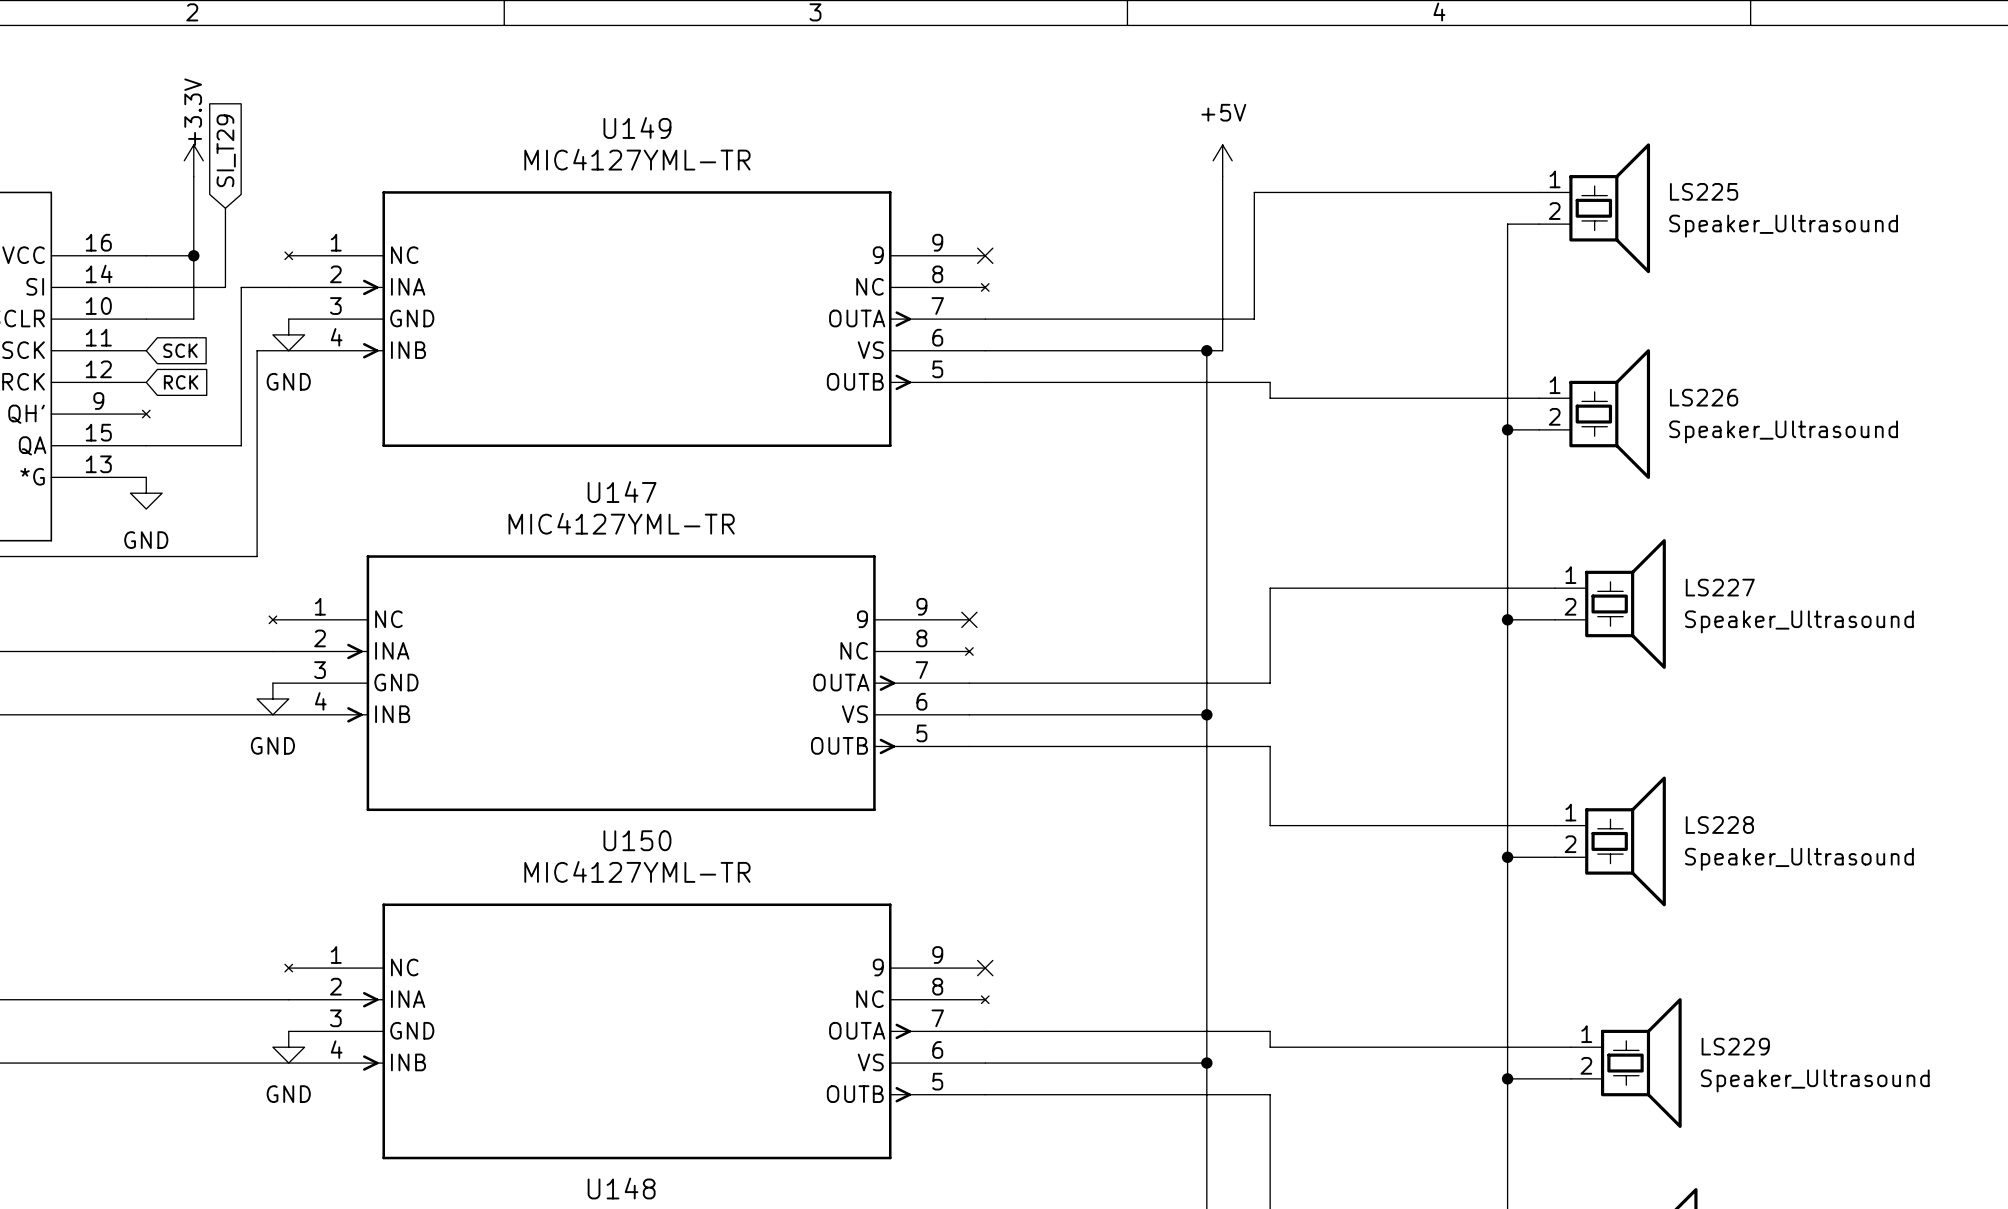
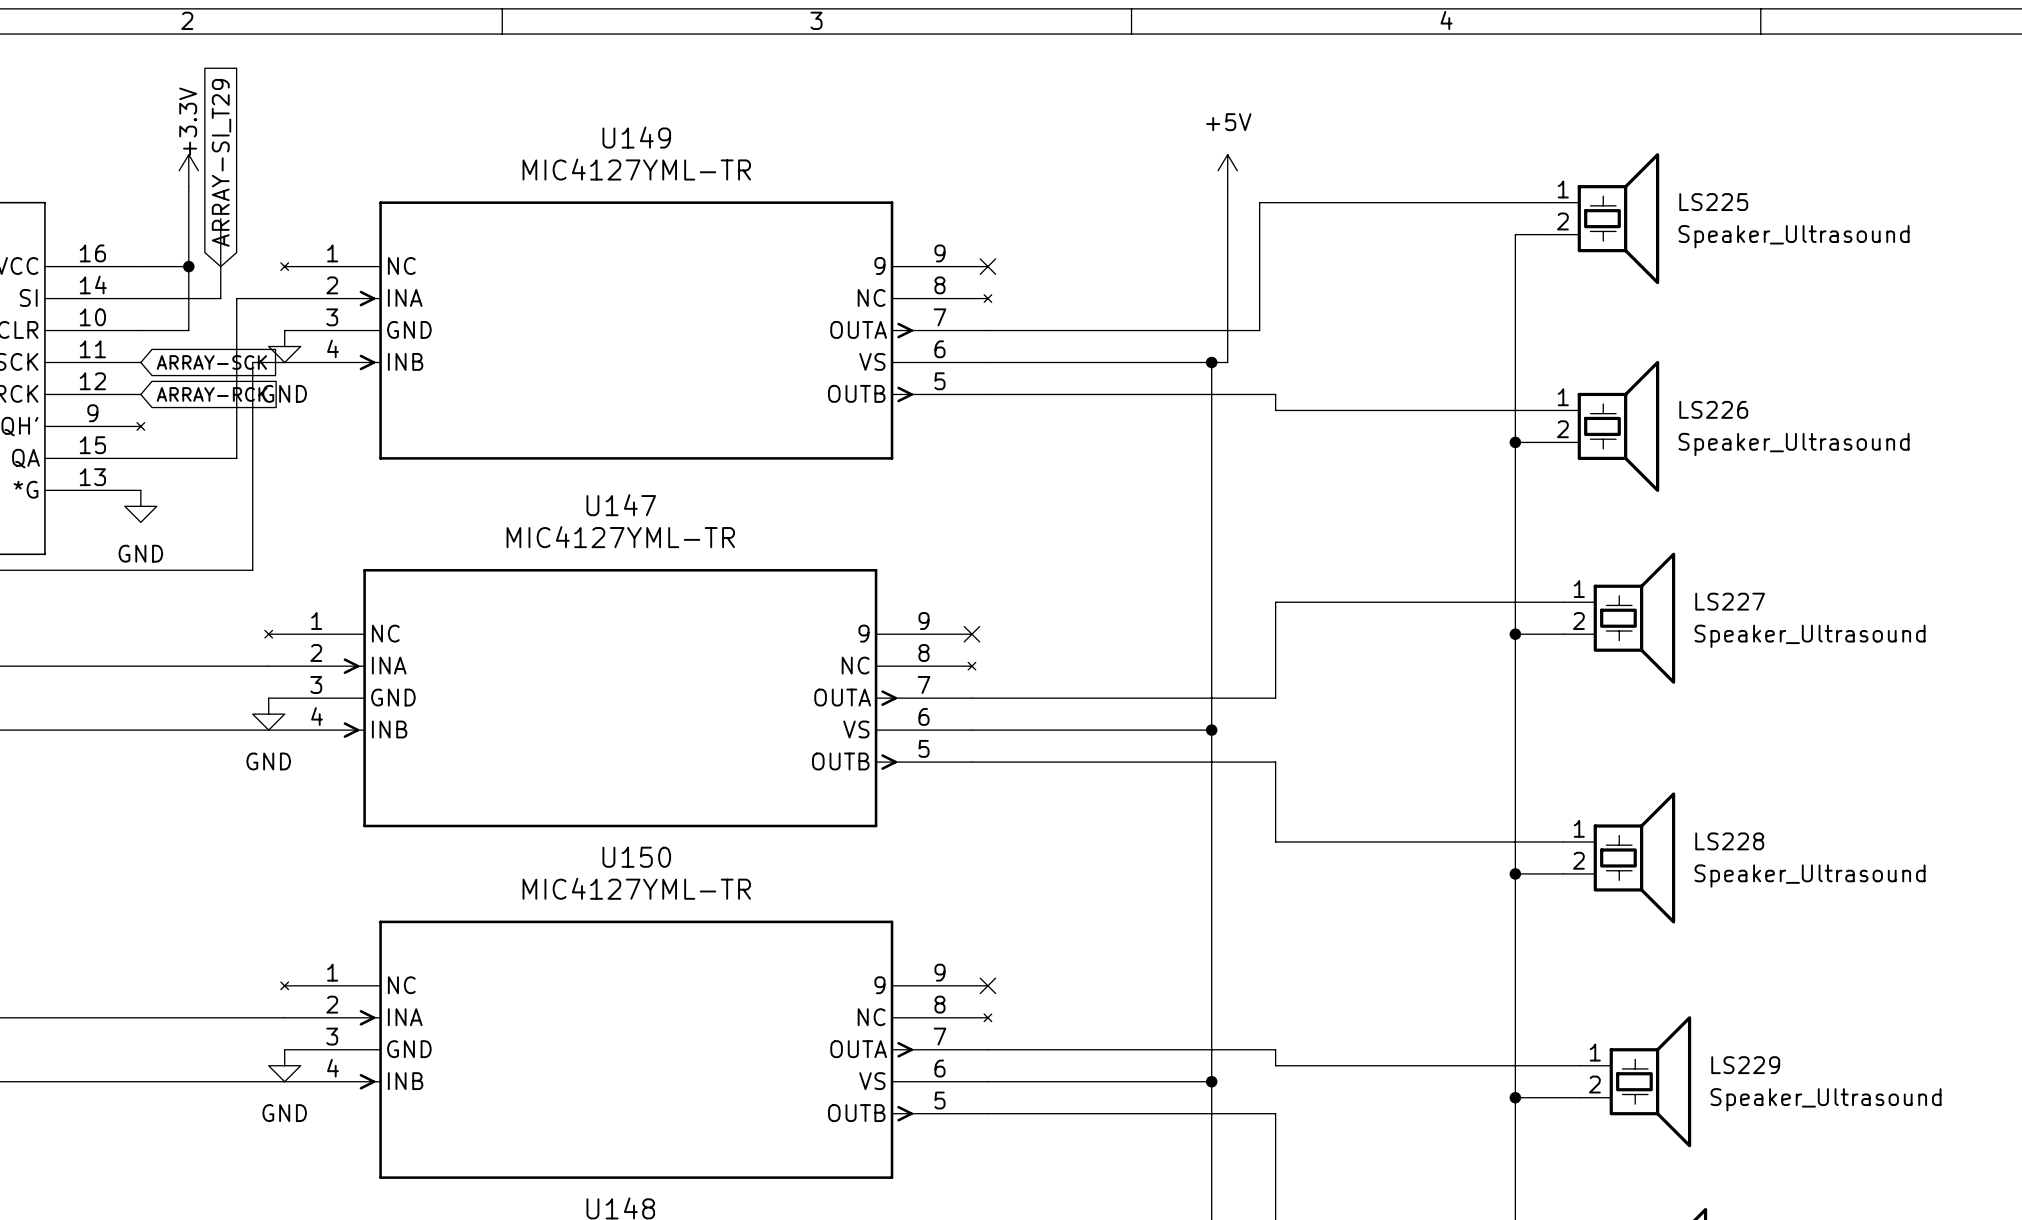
global label: SI_T29 (226, 150) -> ARRAY-SI_T29 (221, 162)
global label: SCK (180, 350) -> ARRAY-SCK (211, 362)
global label: RCK (181, 382) -> ARRAY-RCK (212, 394)

